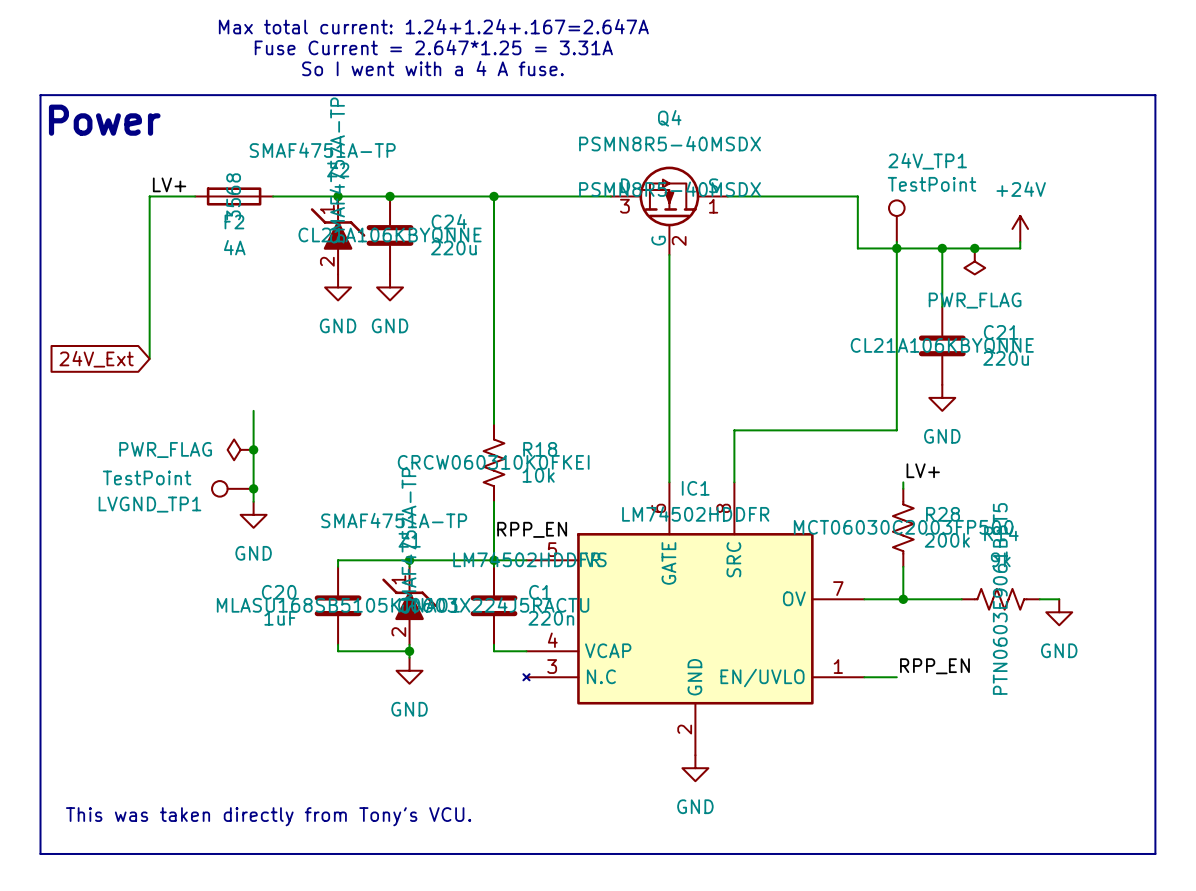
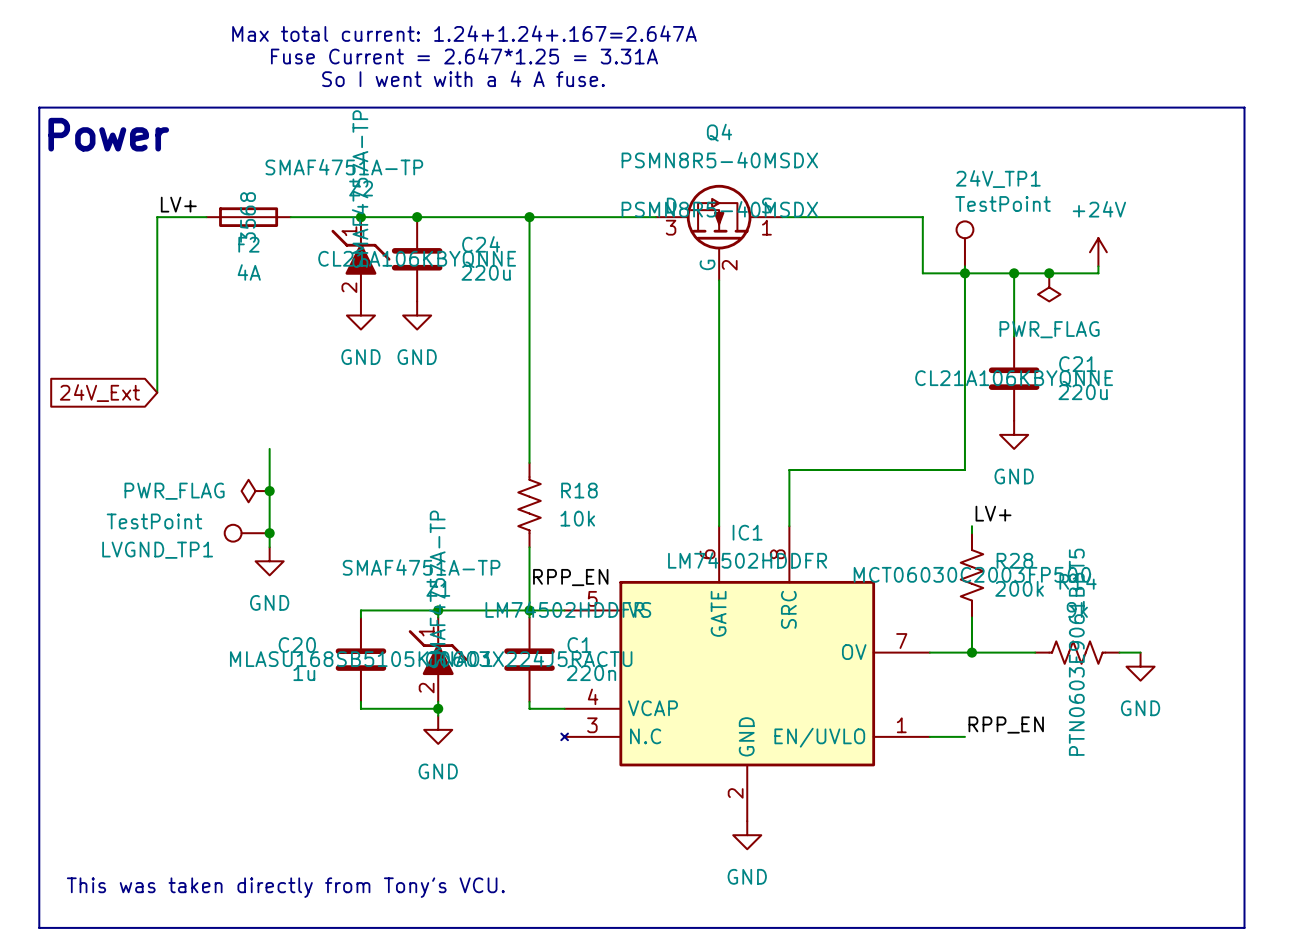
R18 text: CRCW060310K0FKEI (493, 462) -> none
C20 value: 1uF (280, 618) -> 1u (304, 673)

